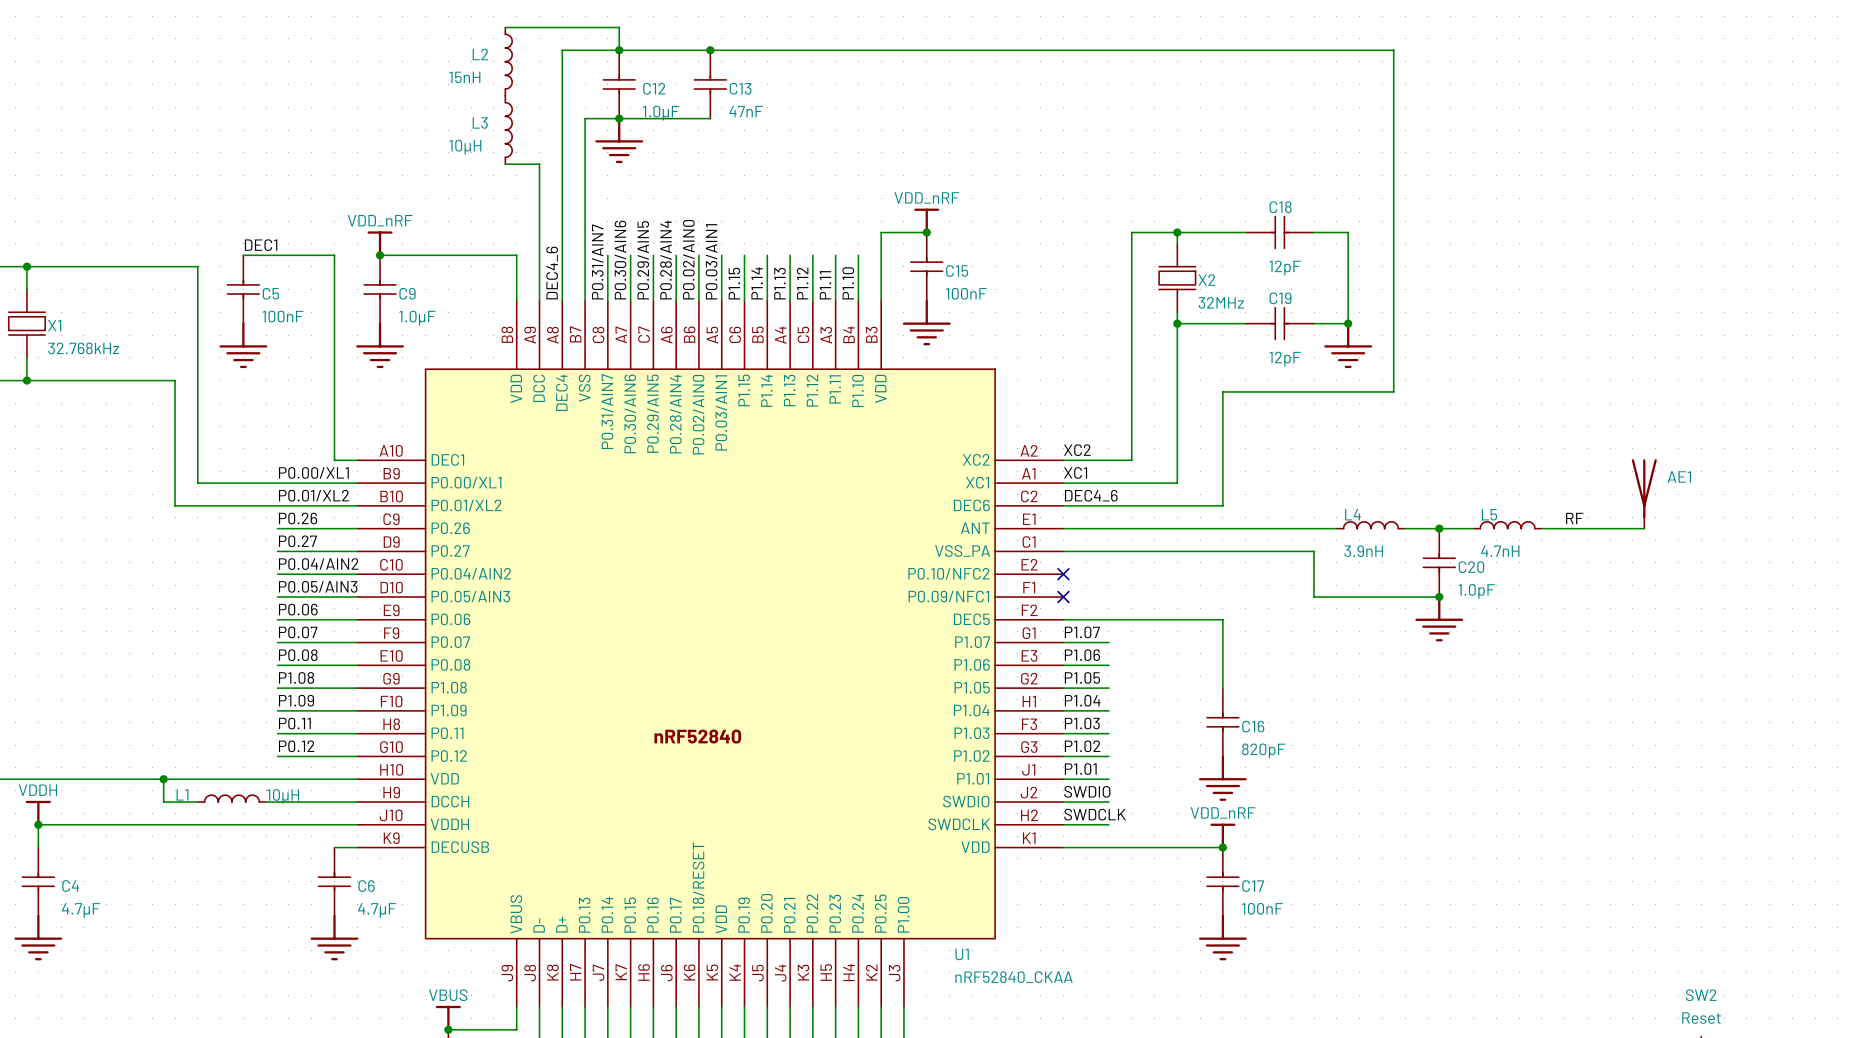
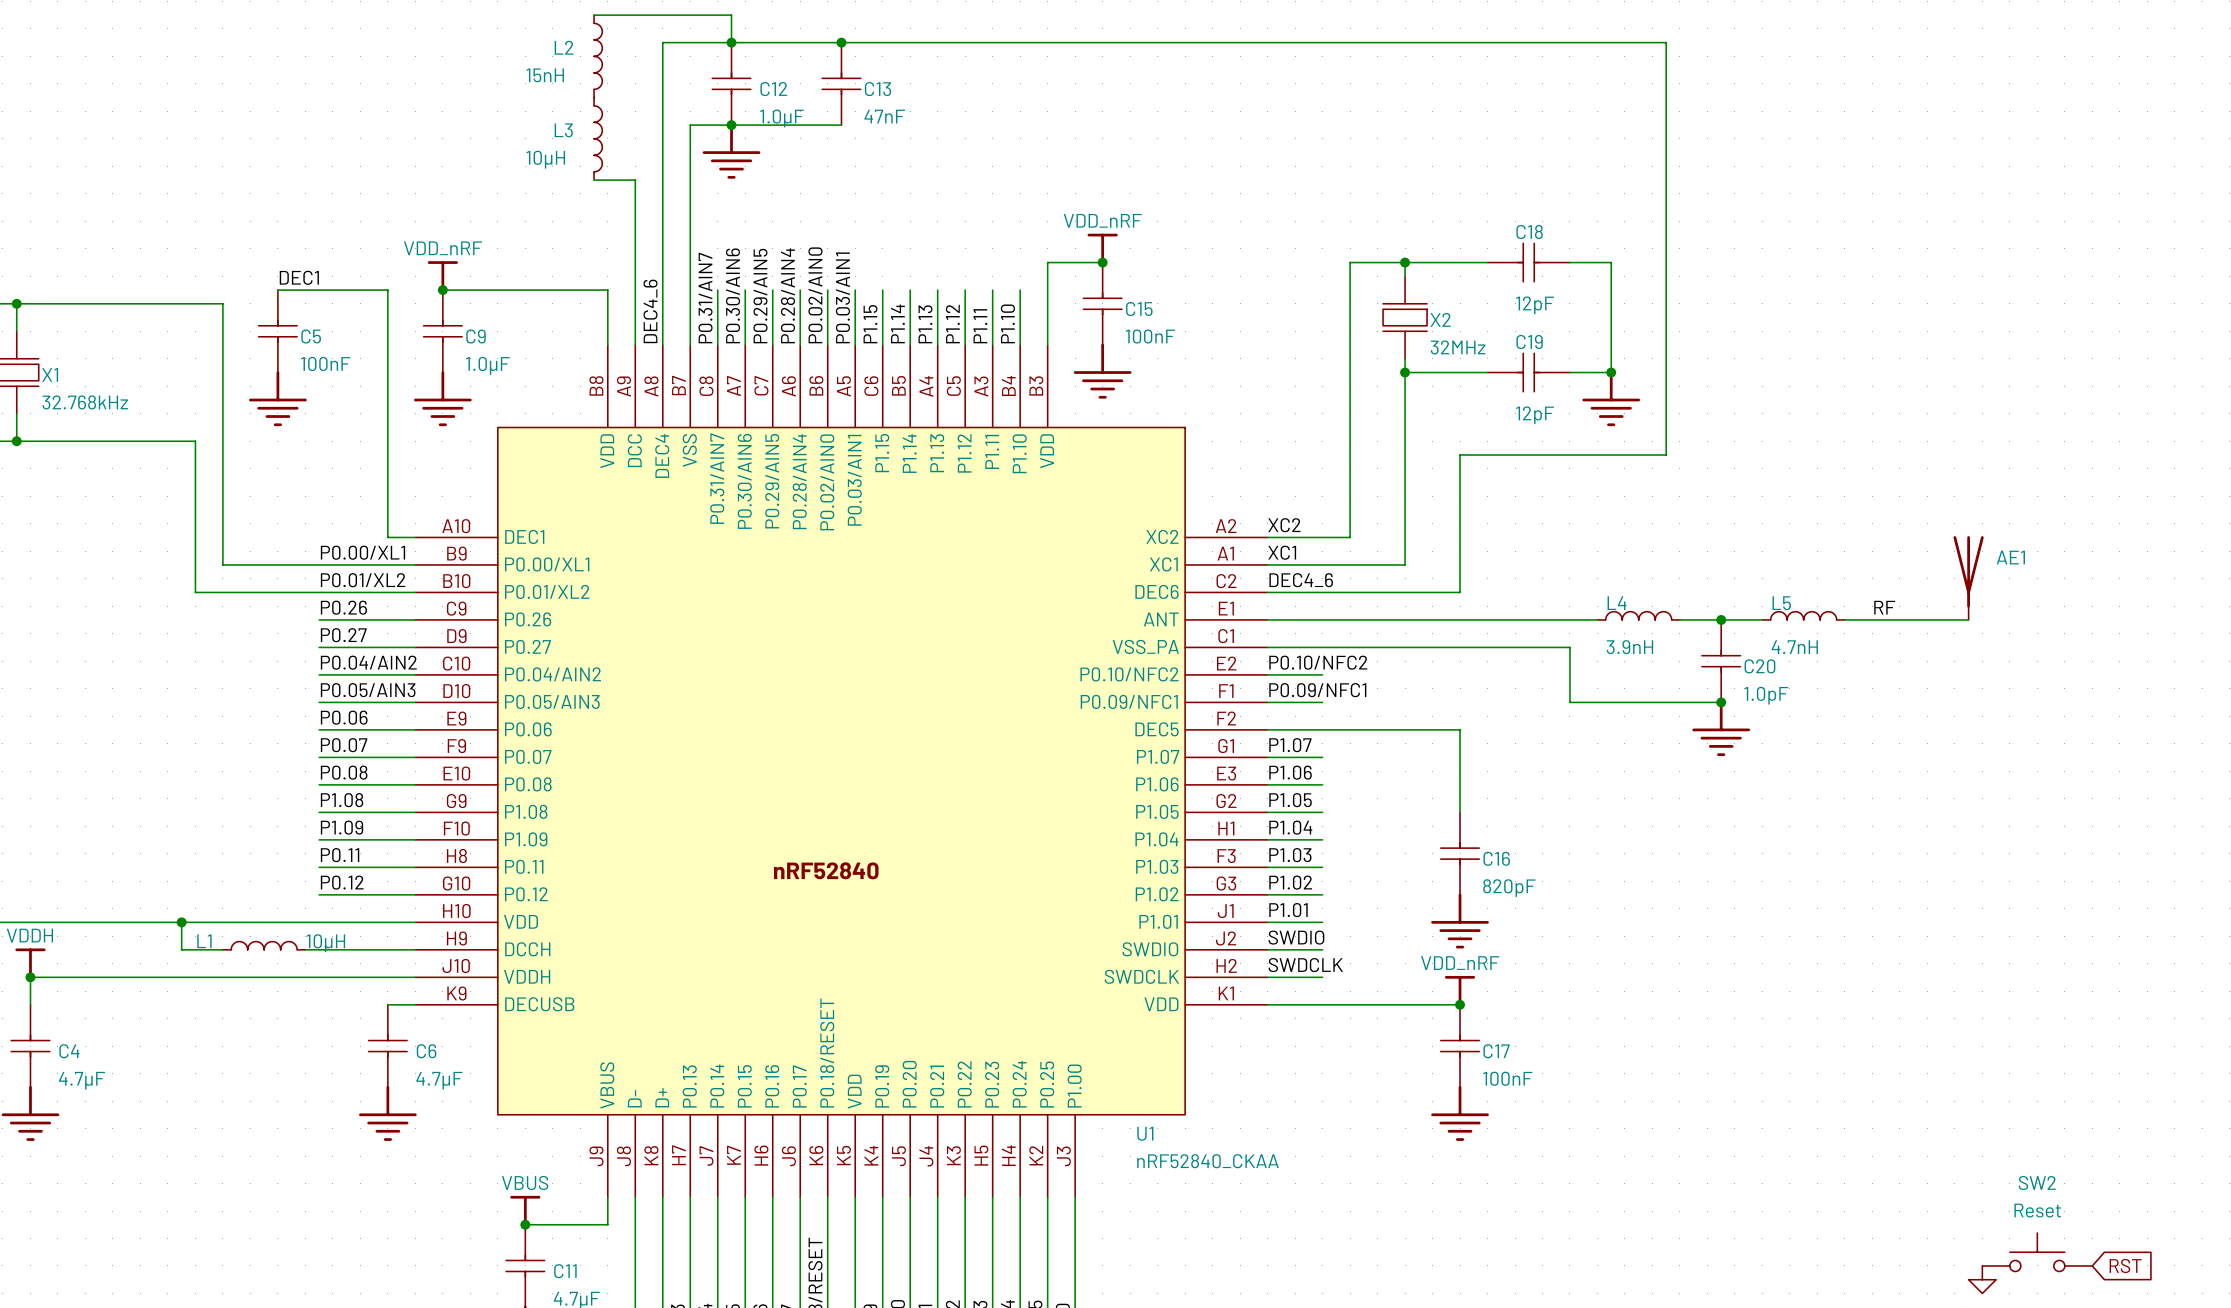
label: none -> P0.10/NFC2 (1318, 662)
wire: none -> (1267, 674) (1322, 674)
no-connect mark: (1063, 574) -> none
label: none -> P0.09/NFC1 (1317, 690)
wire: none -> (1267, 702) (1322, 702)
no-connect mark: (1063, 596) -> none

